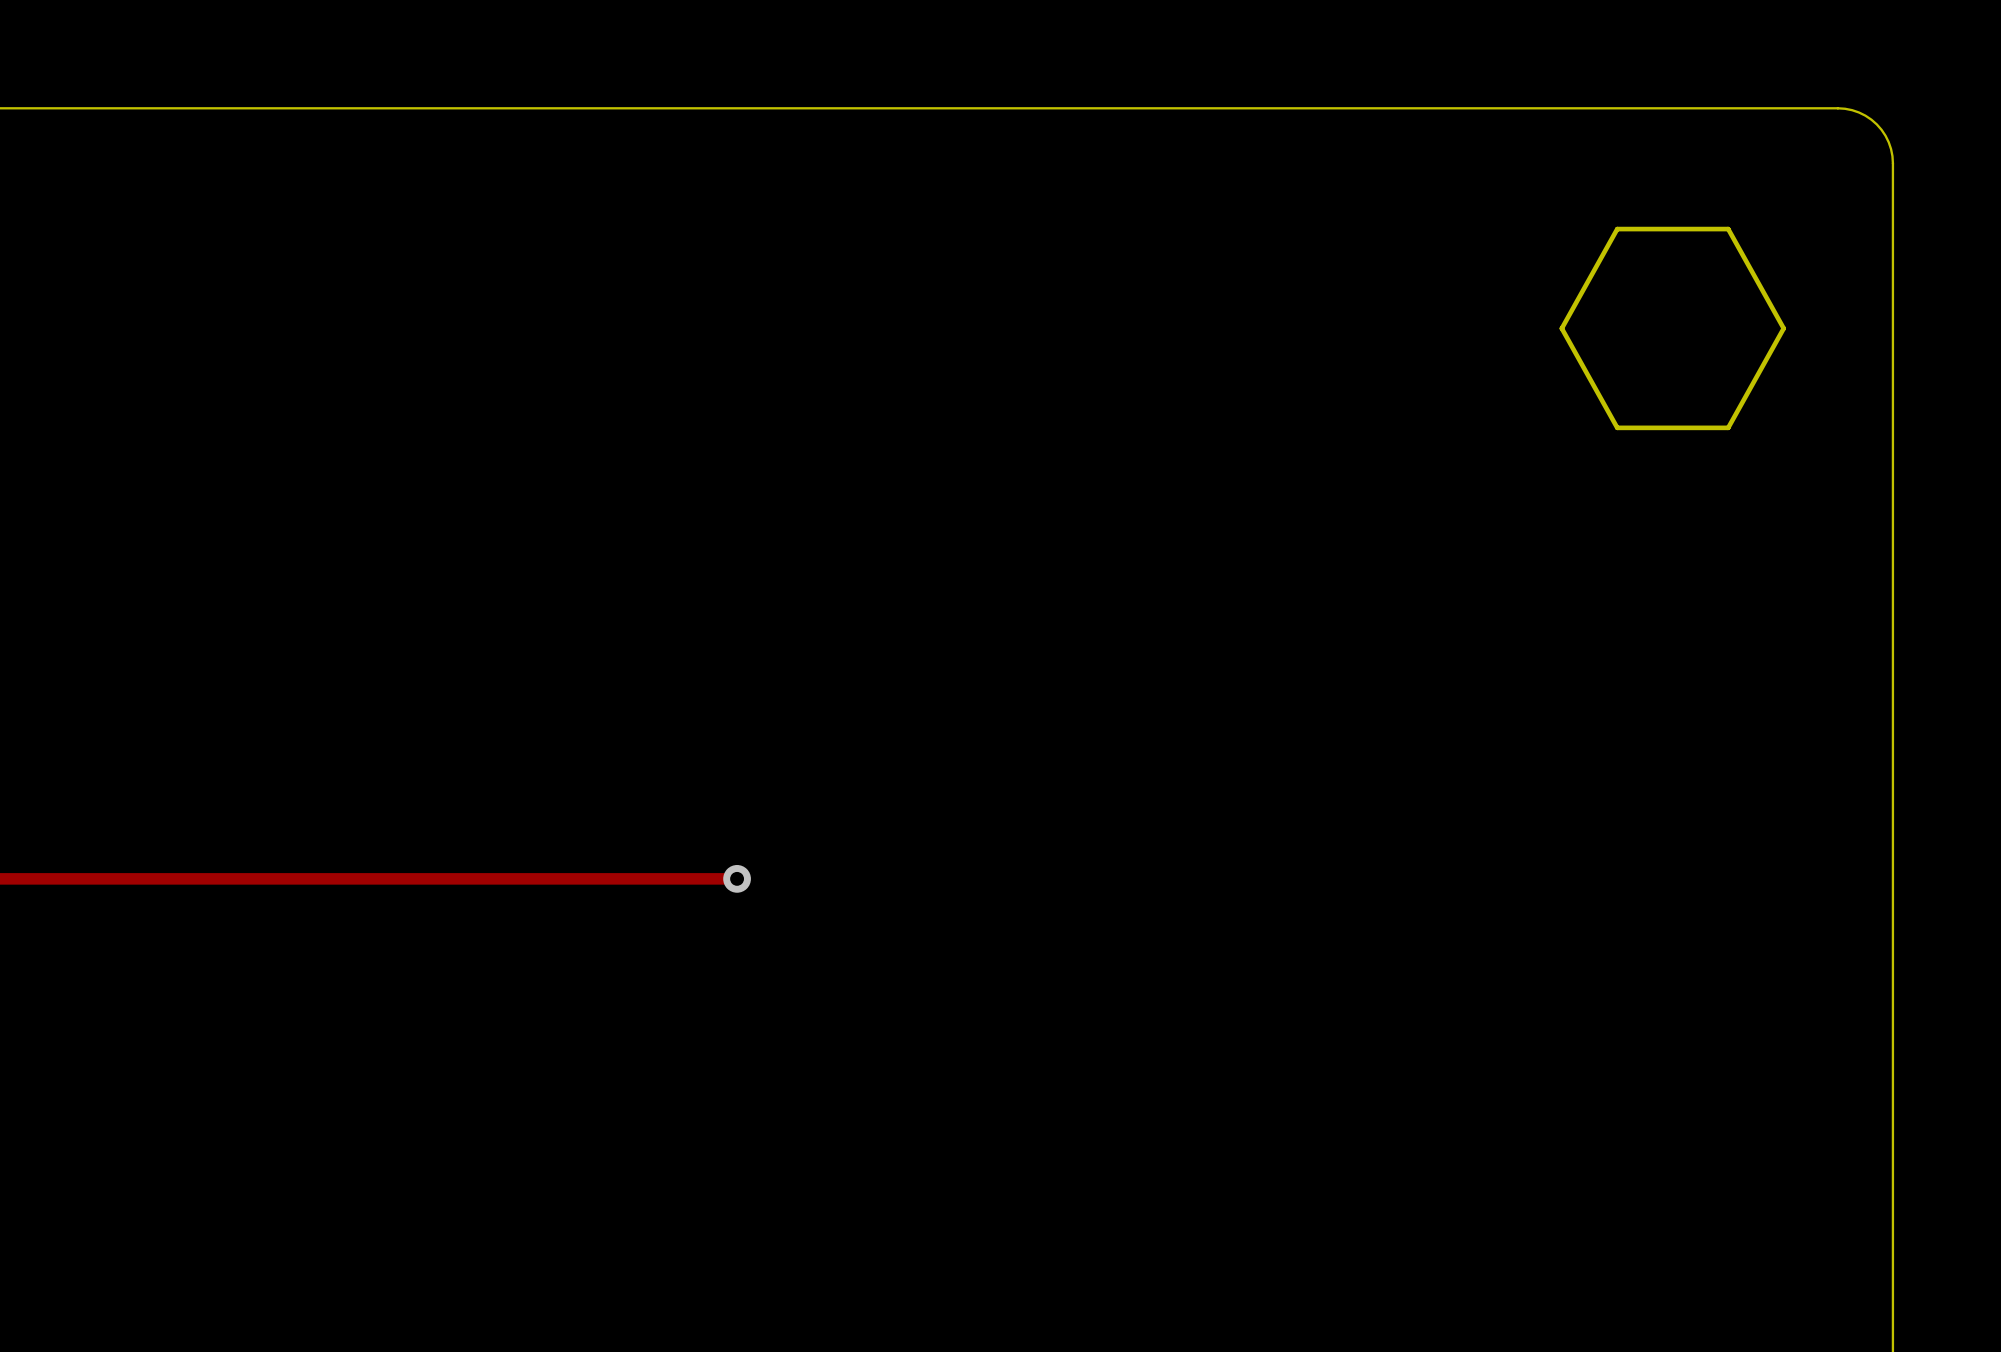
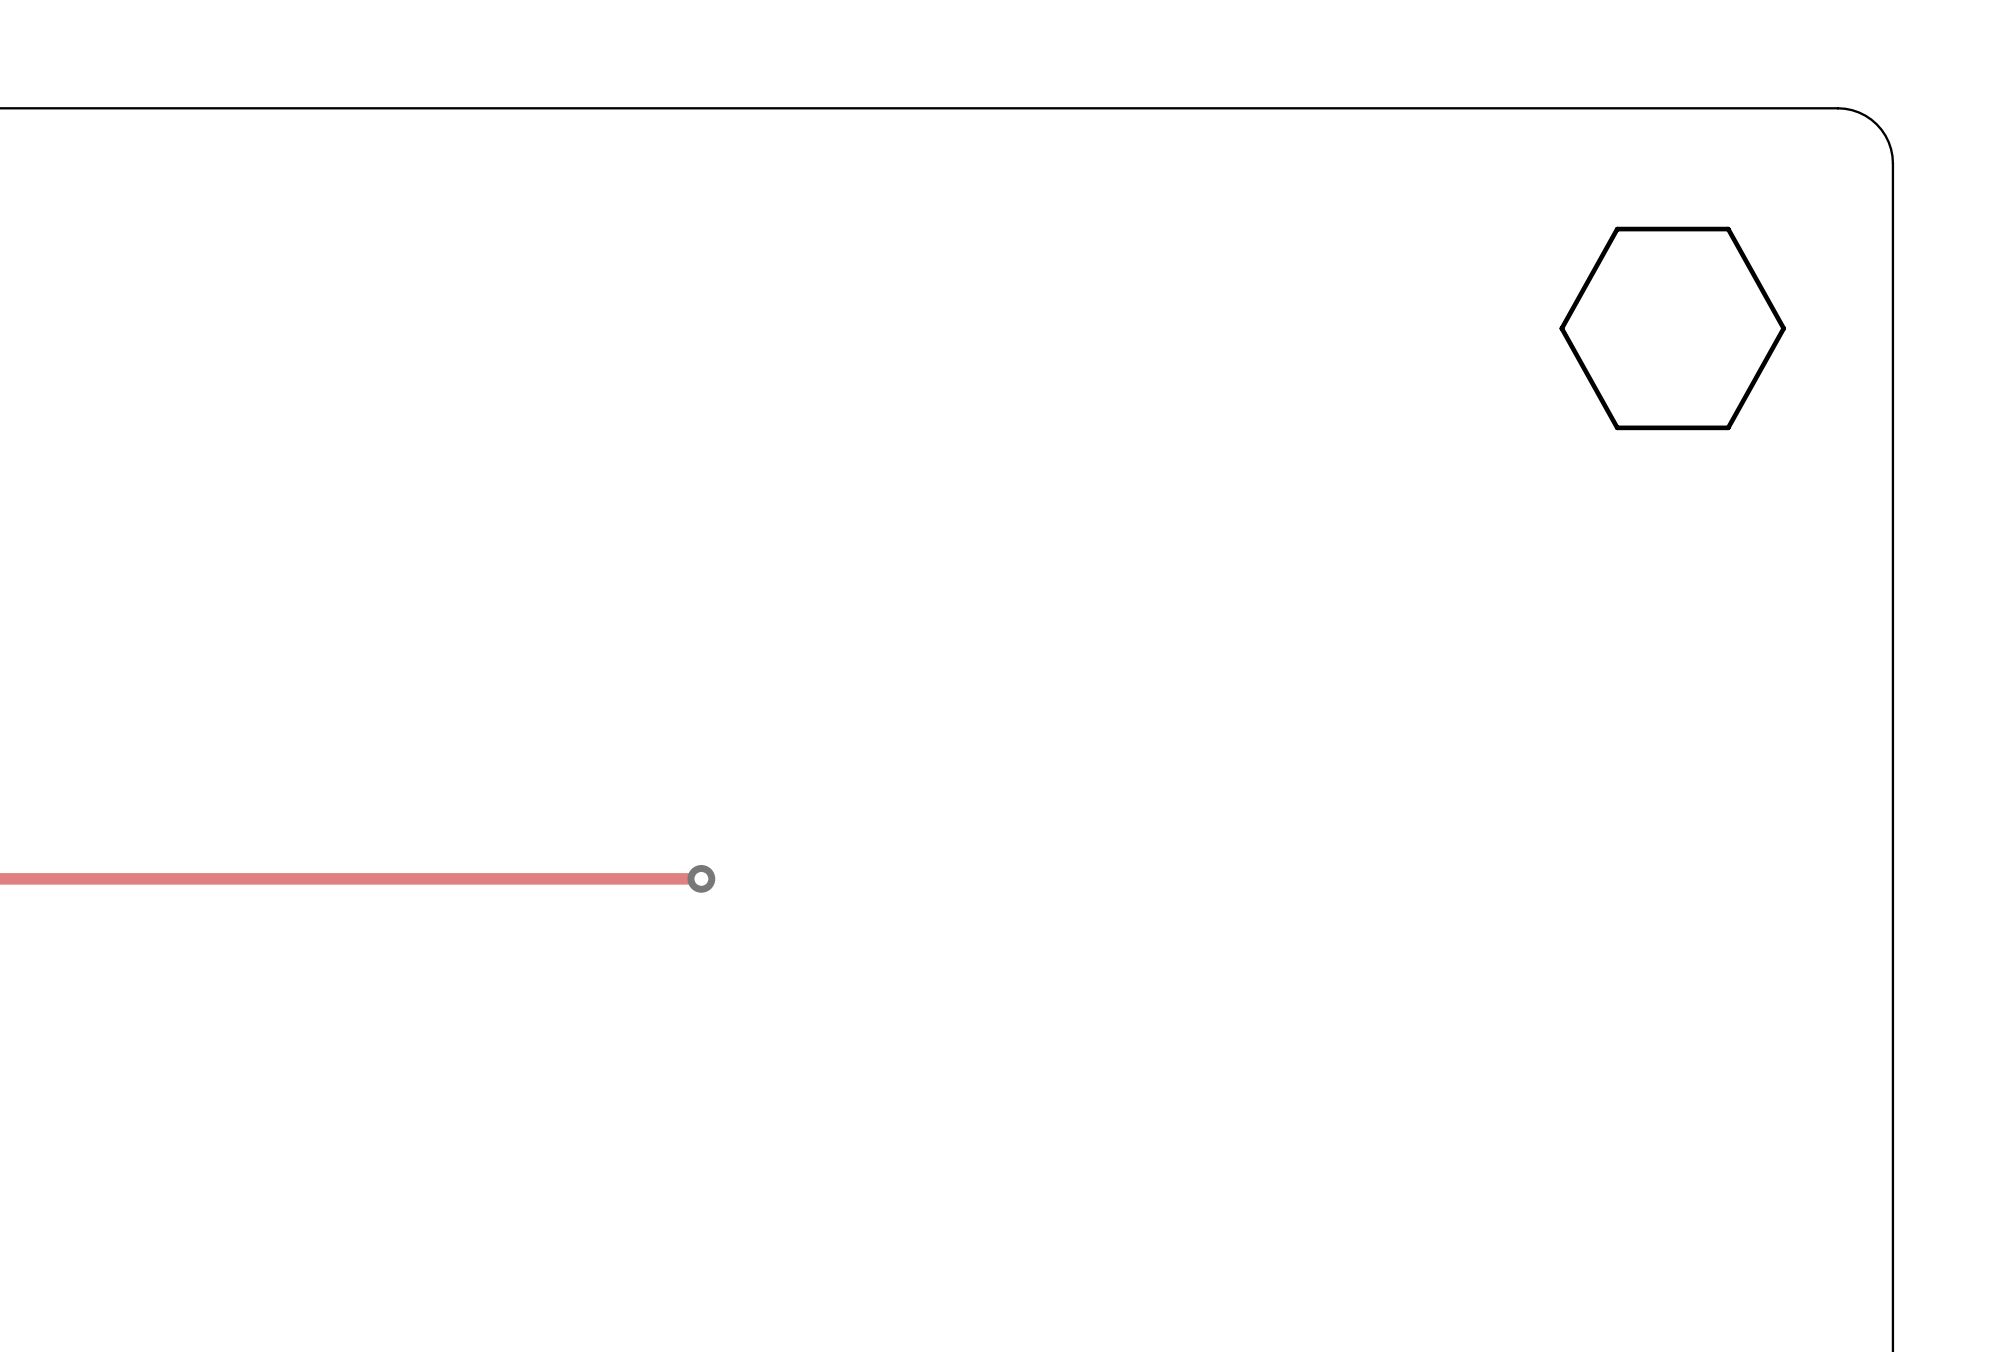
via position: (737, 878) -> (701, 878)

